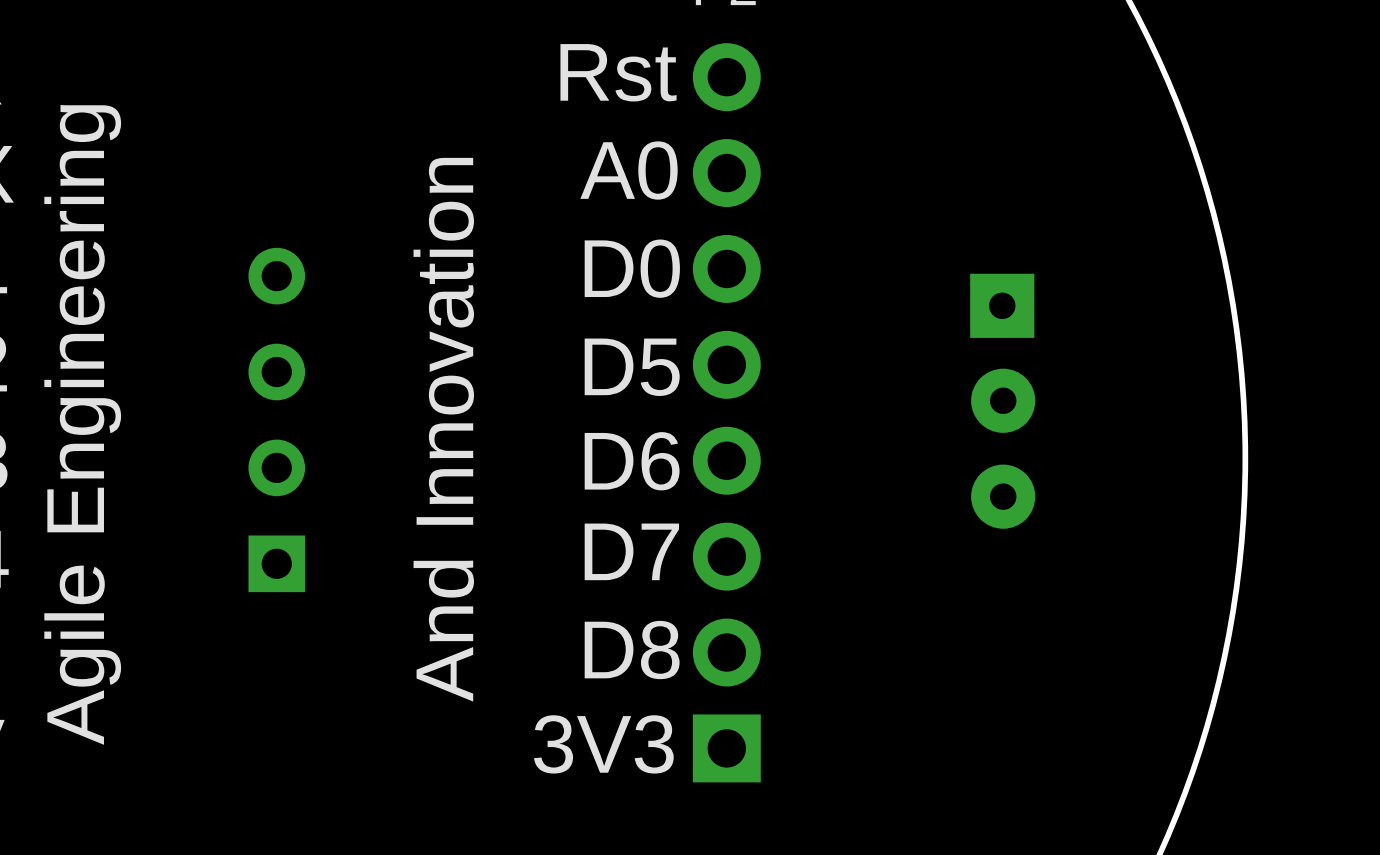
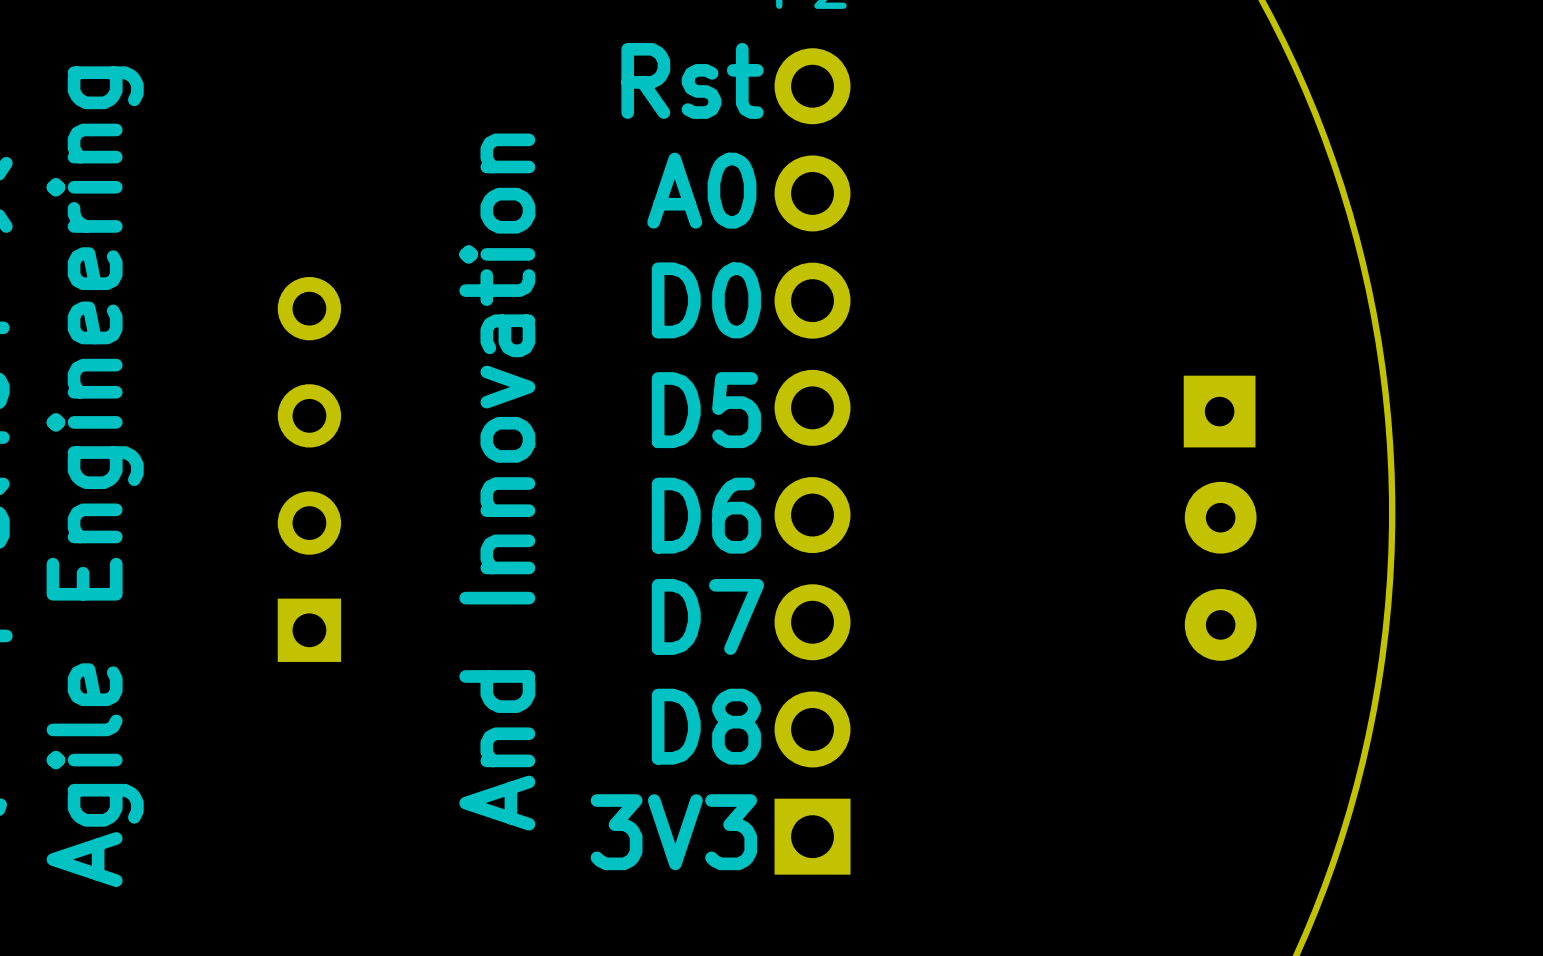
part position: (1002, 401) -> (1220, 518)

